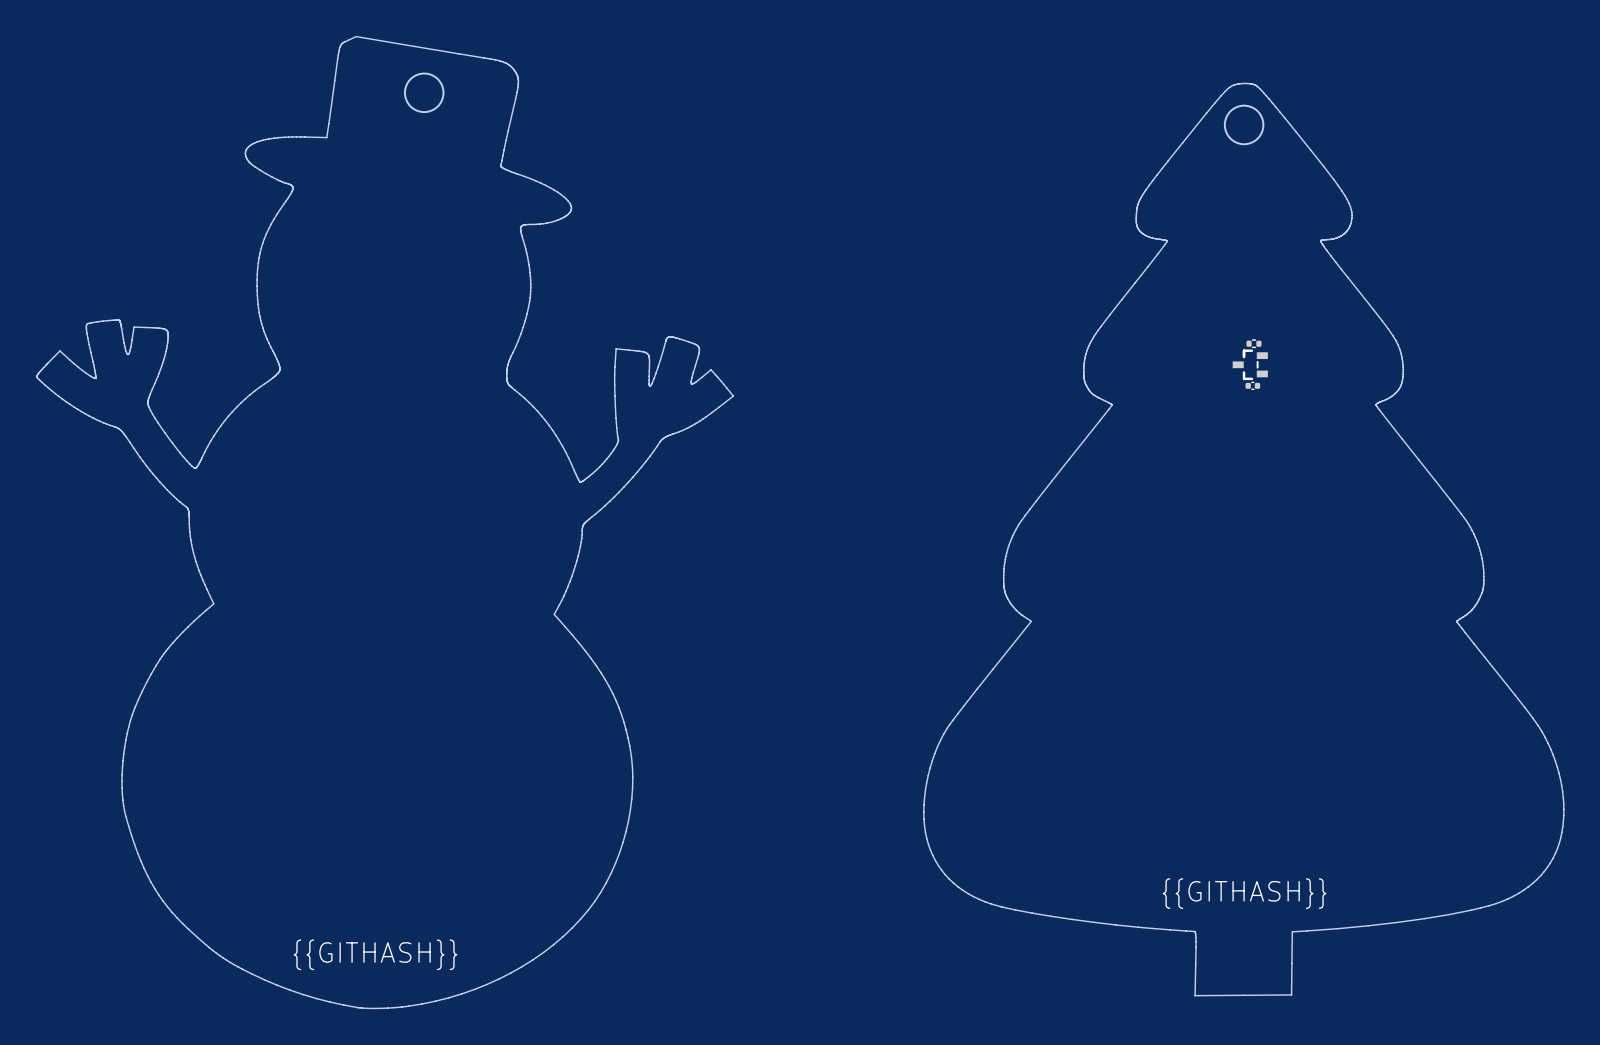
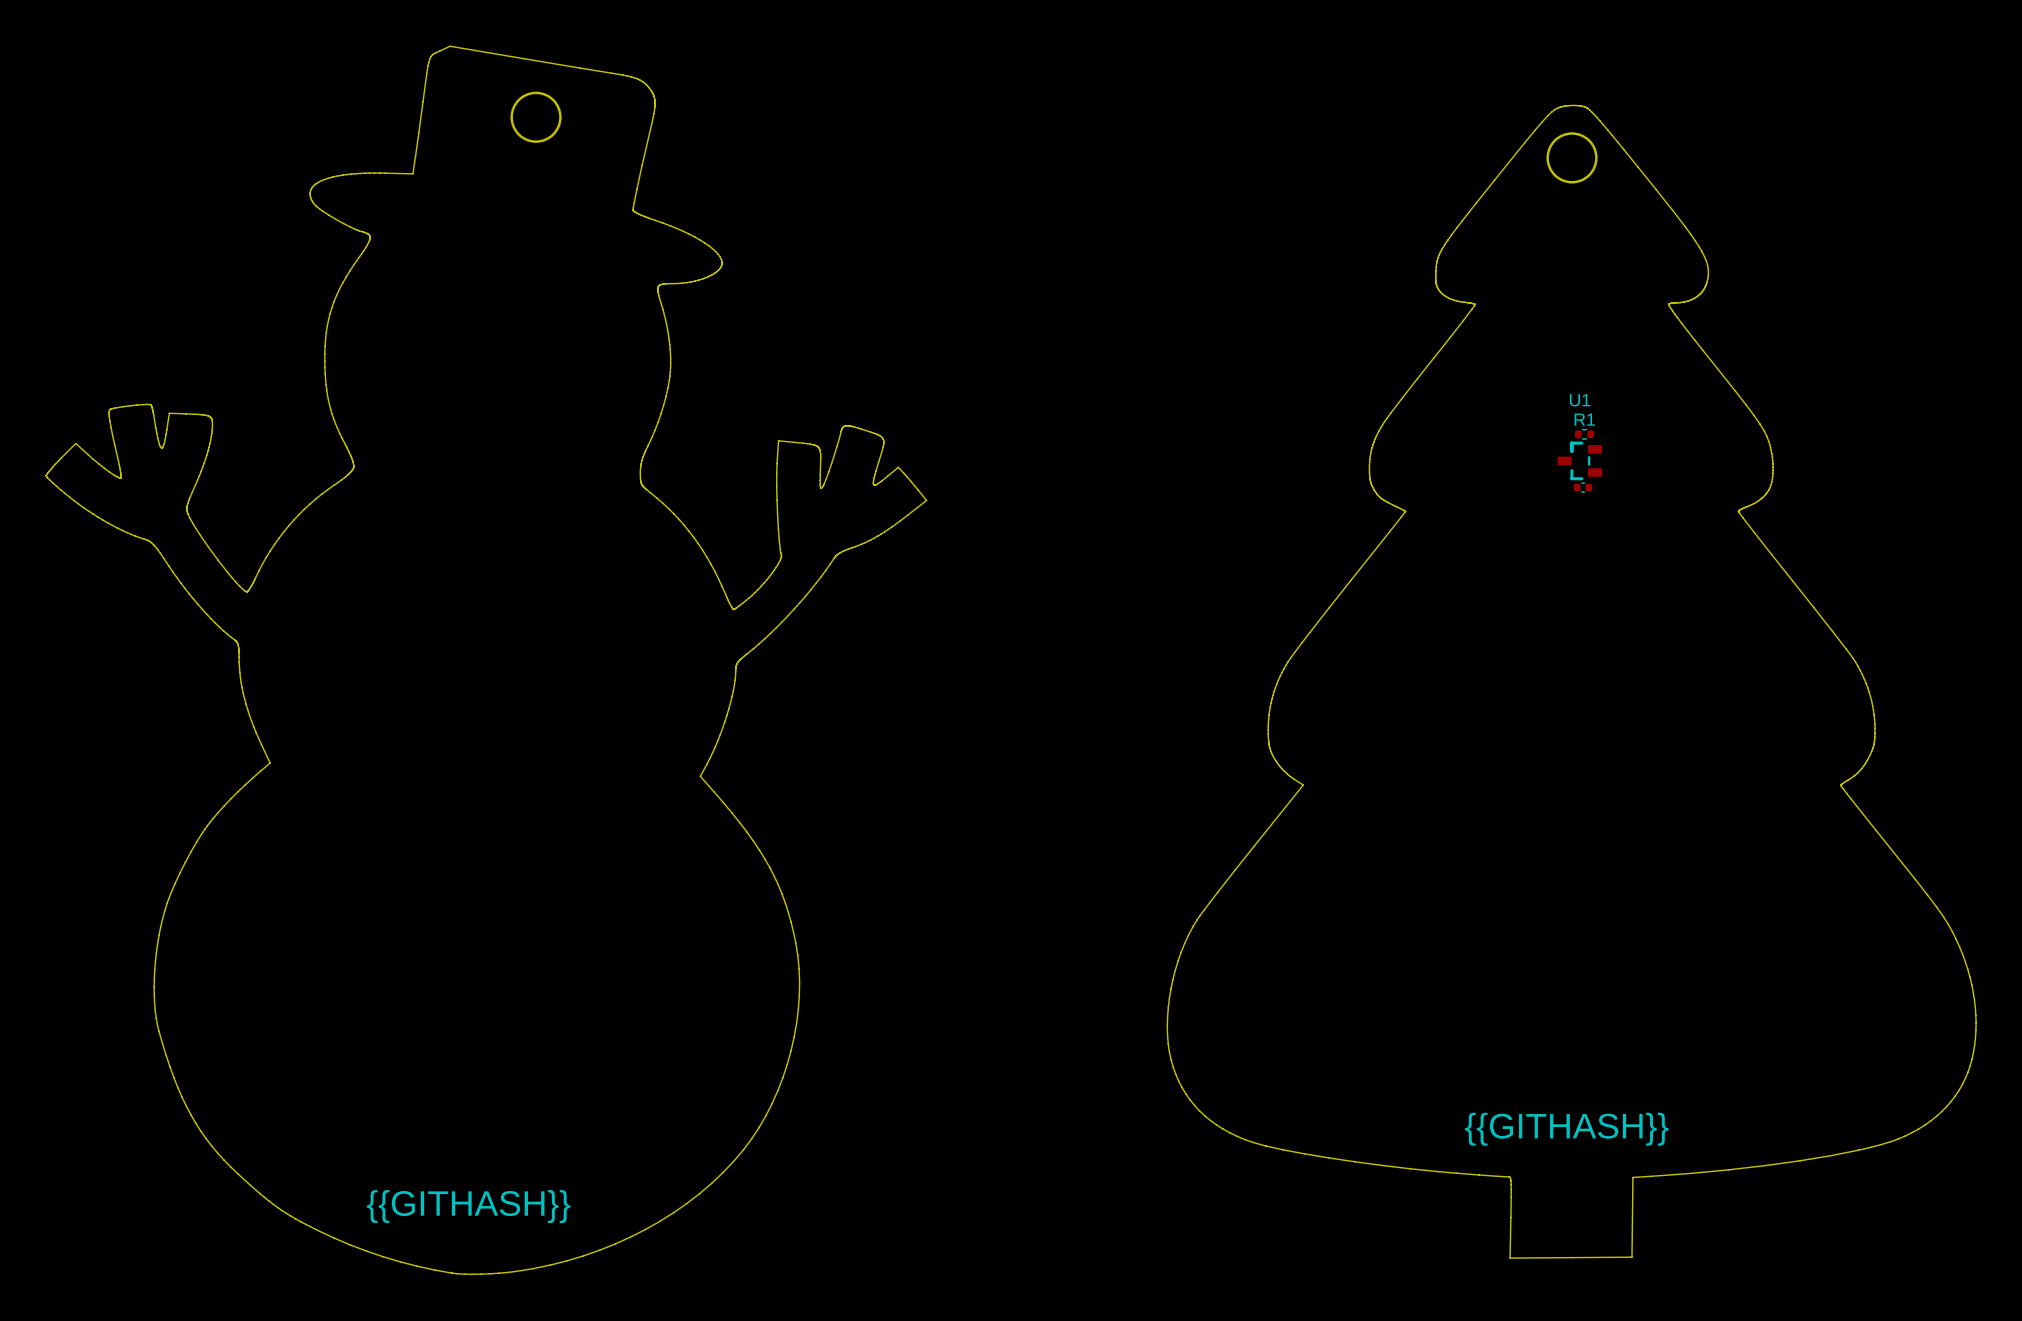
U1 name: none -> U1 (1580, 400)
R1 name: none -> R1 (1584, 419)

